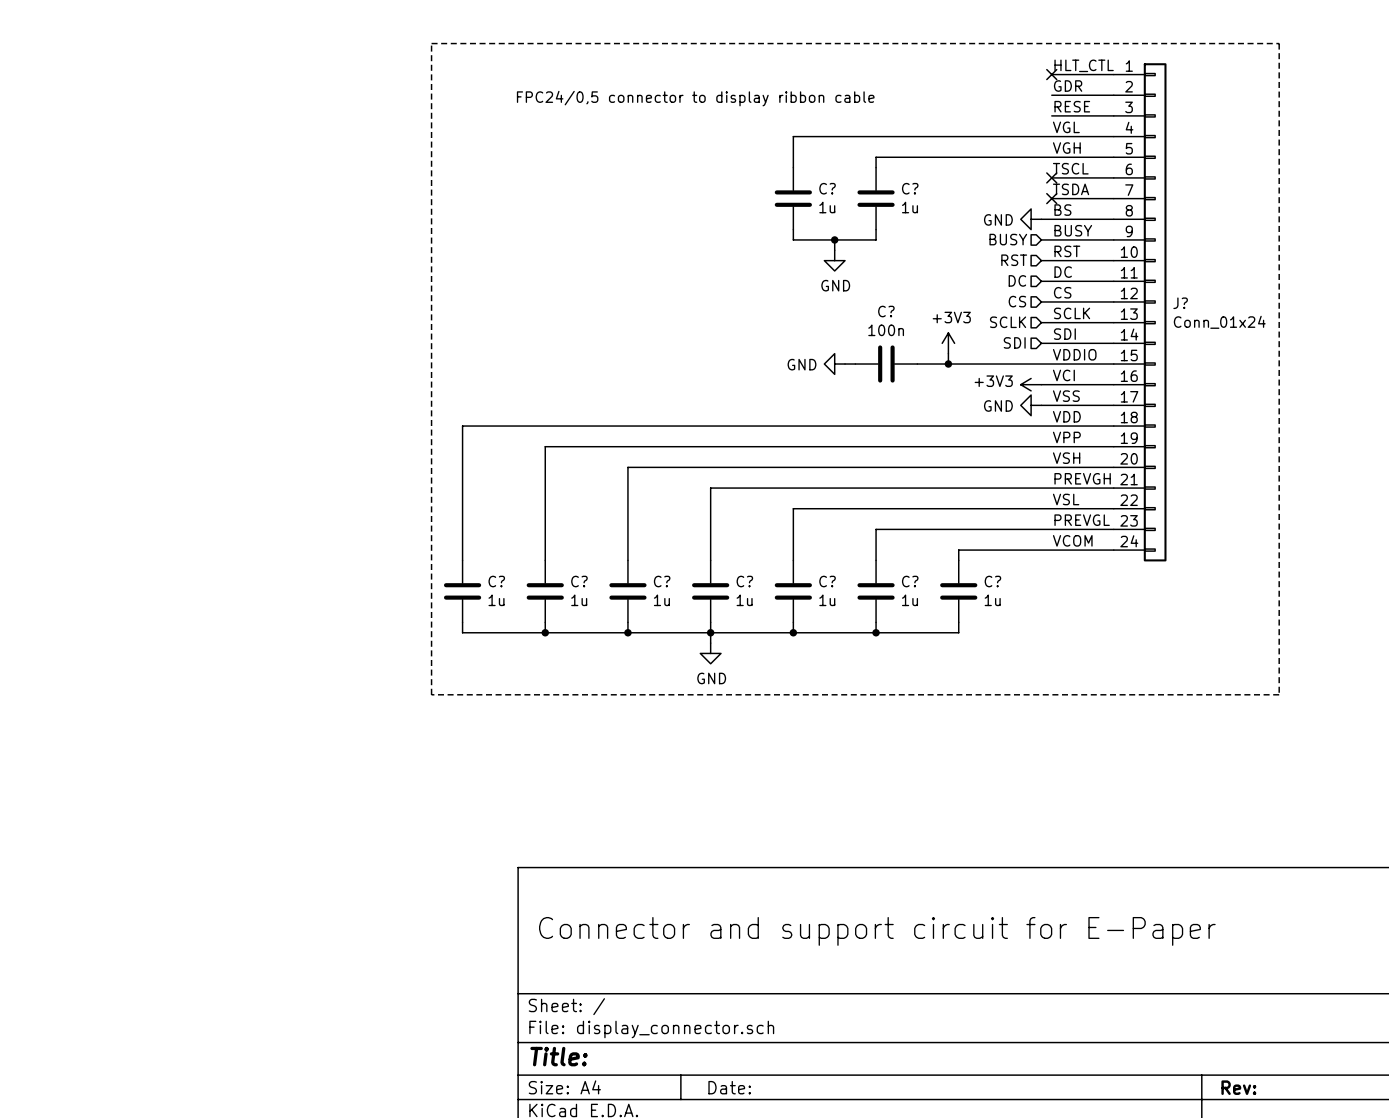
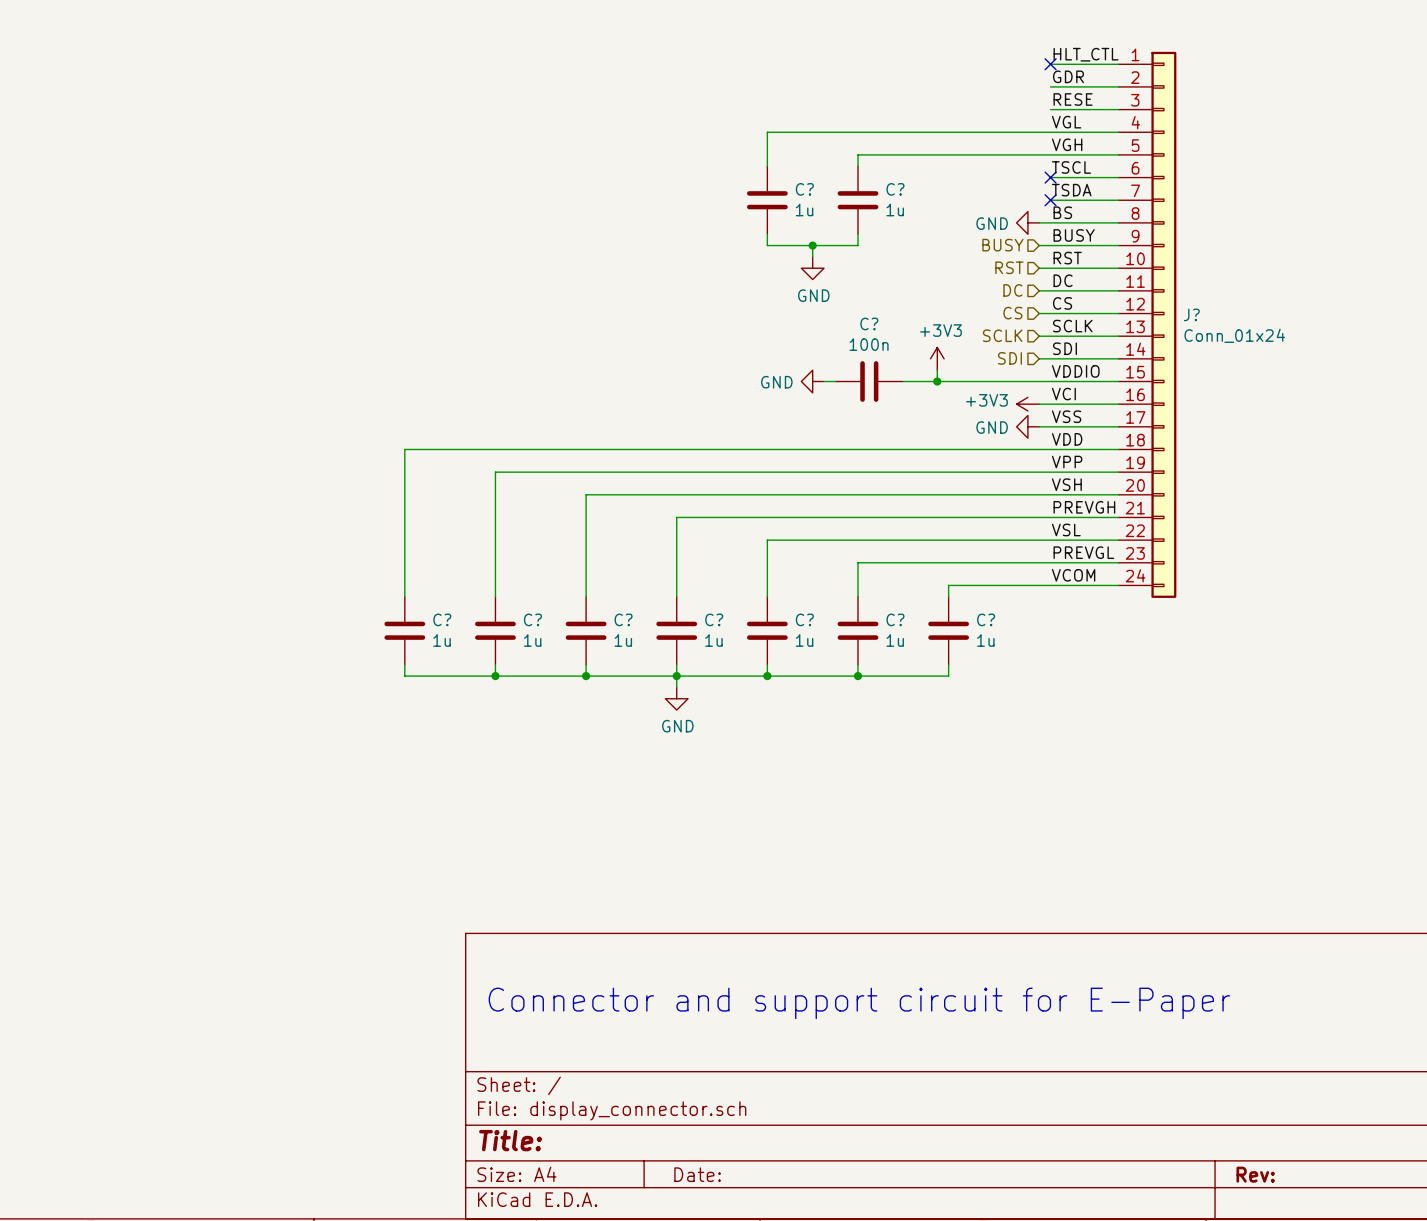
line: (431, 43) (431, 694) (1279, 694) (1279, 43) (431, 43) -> none
text: FPC24/0,5 connector to display ribbon cable (695, 98) -> none

